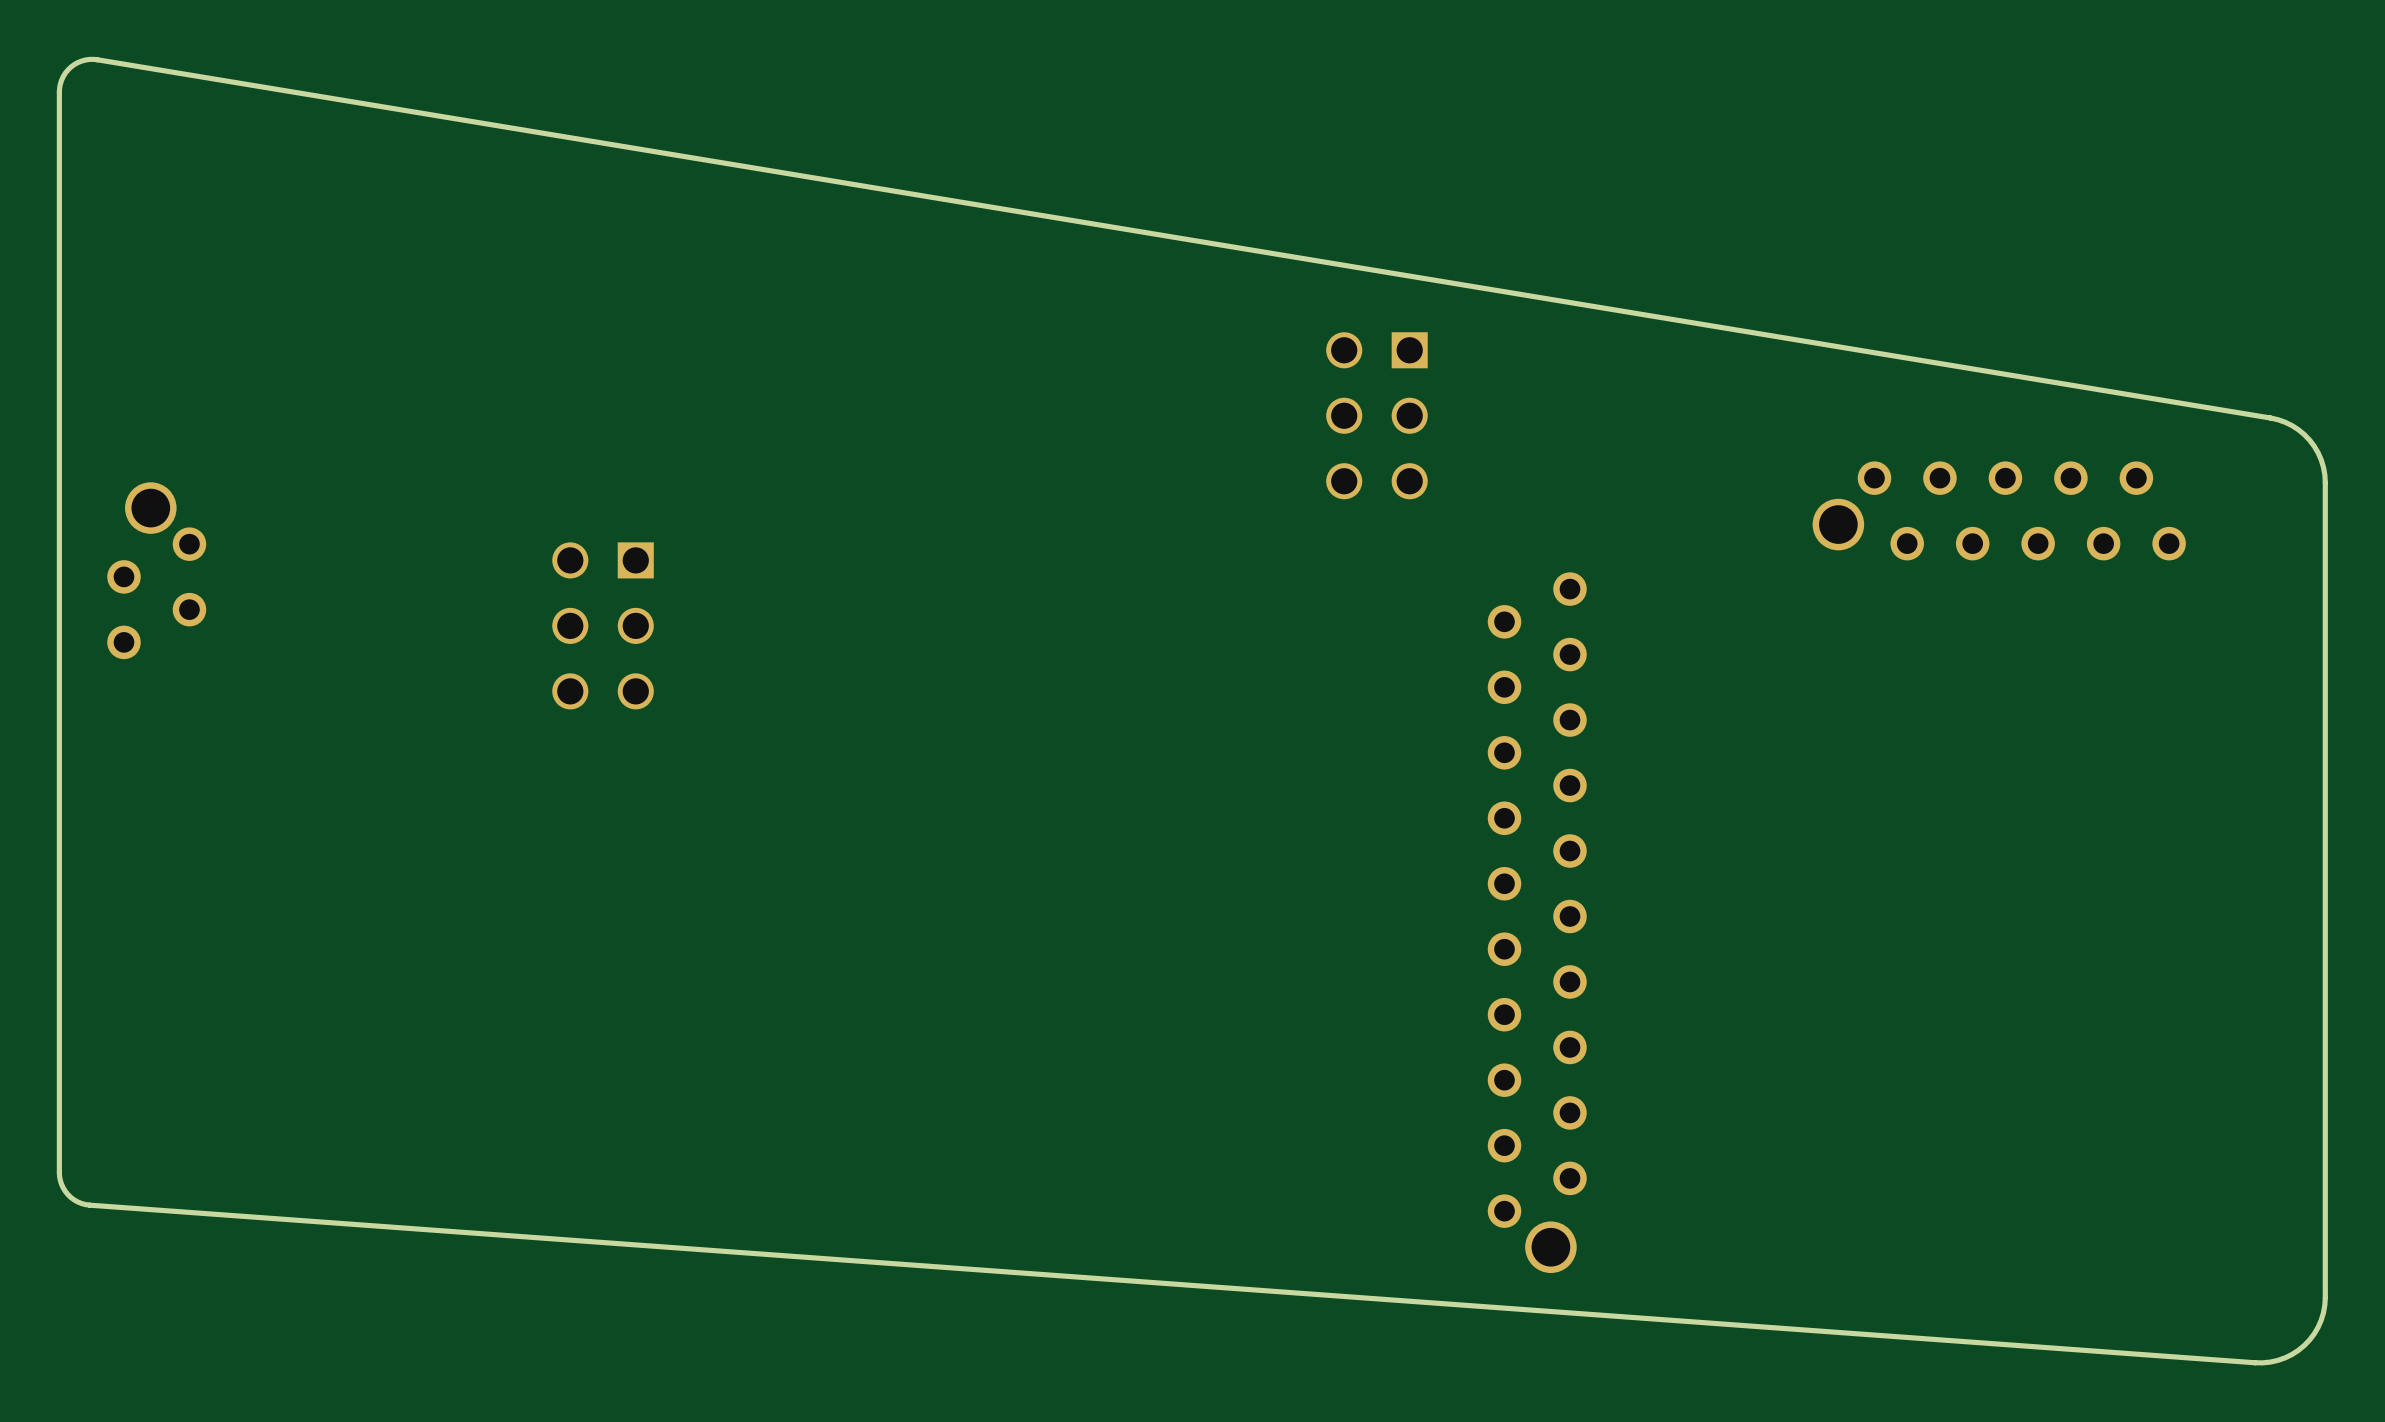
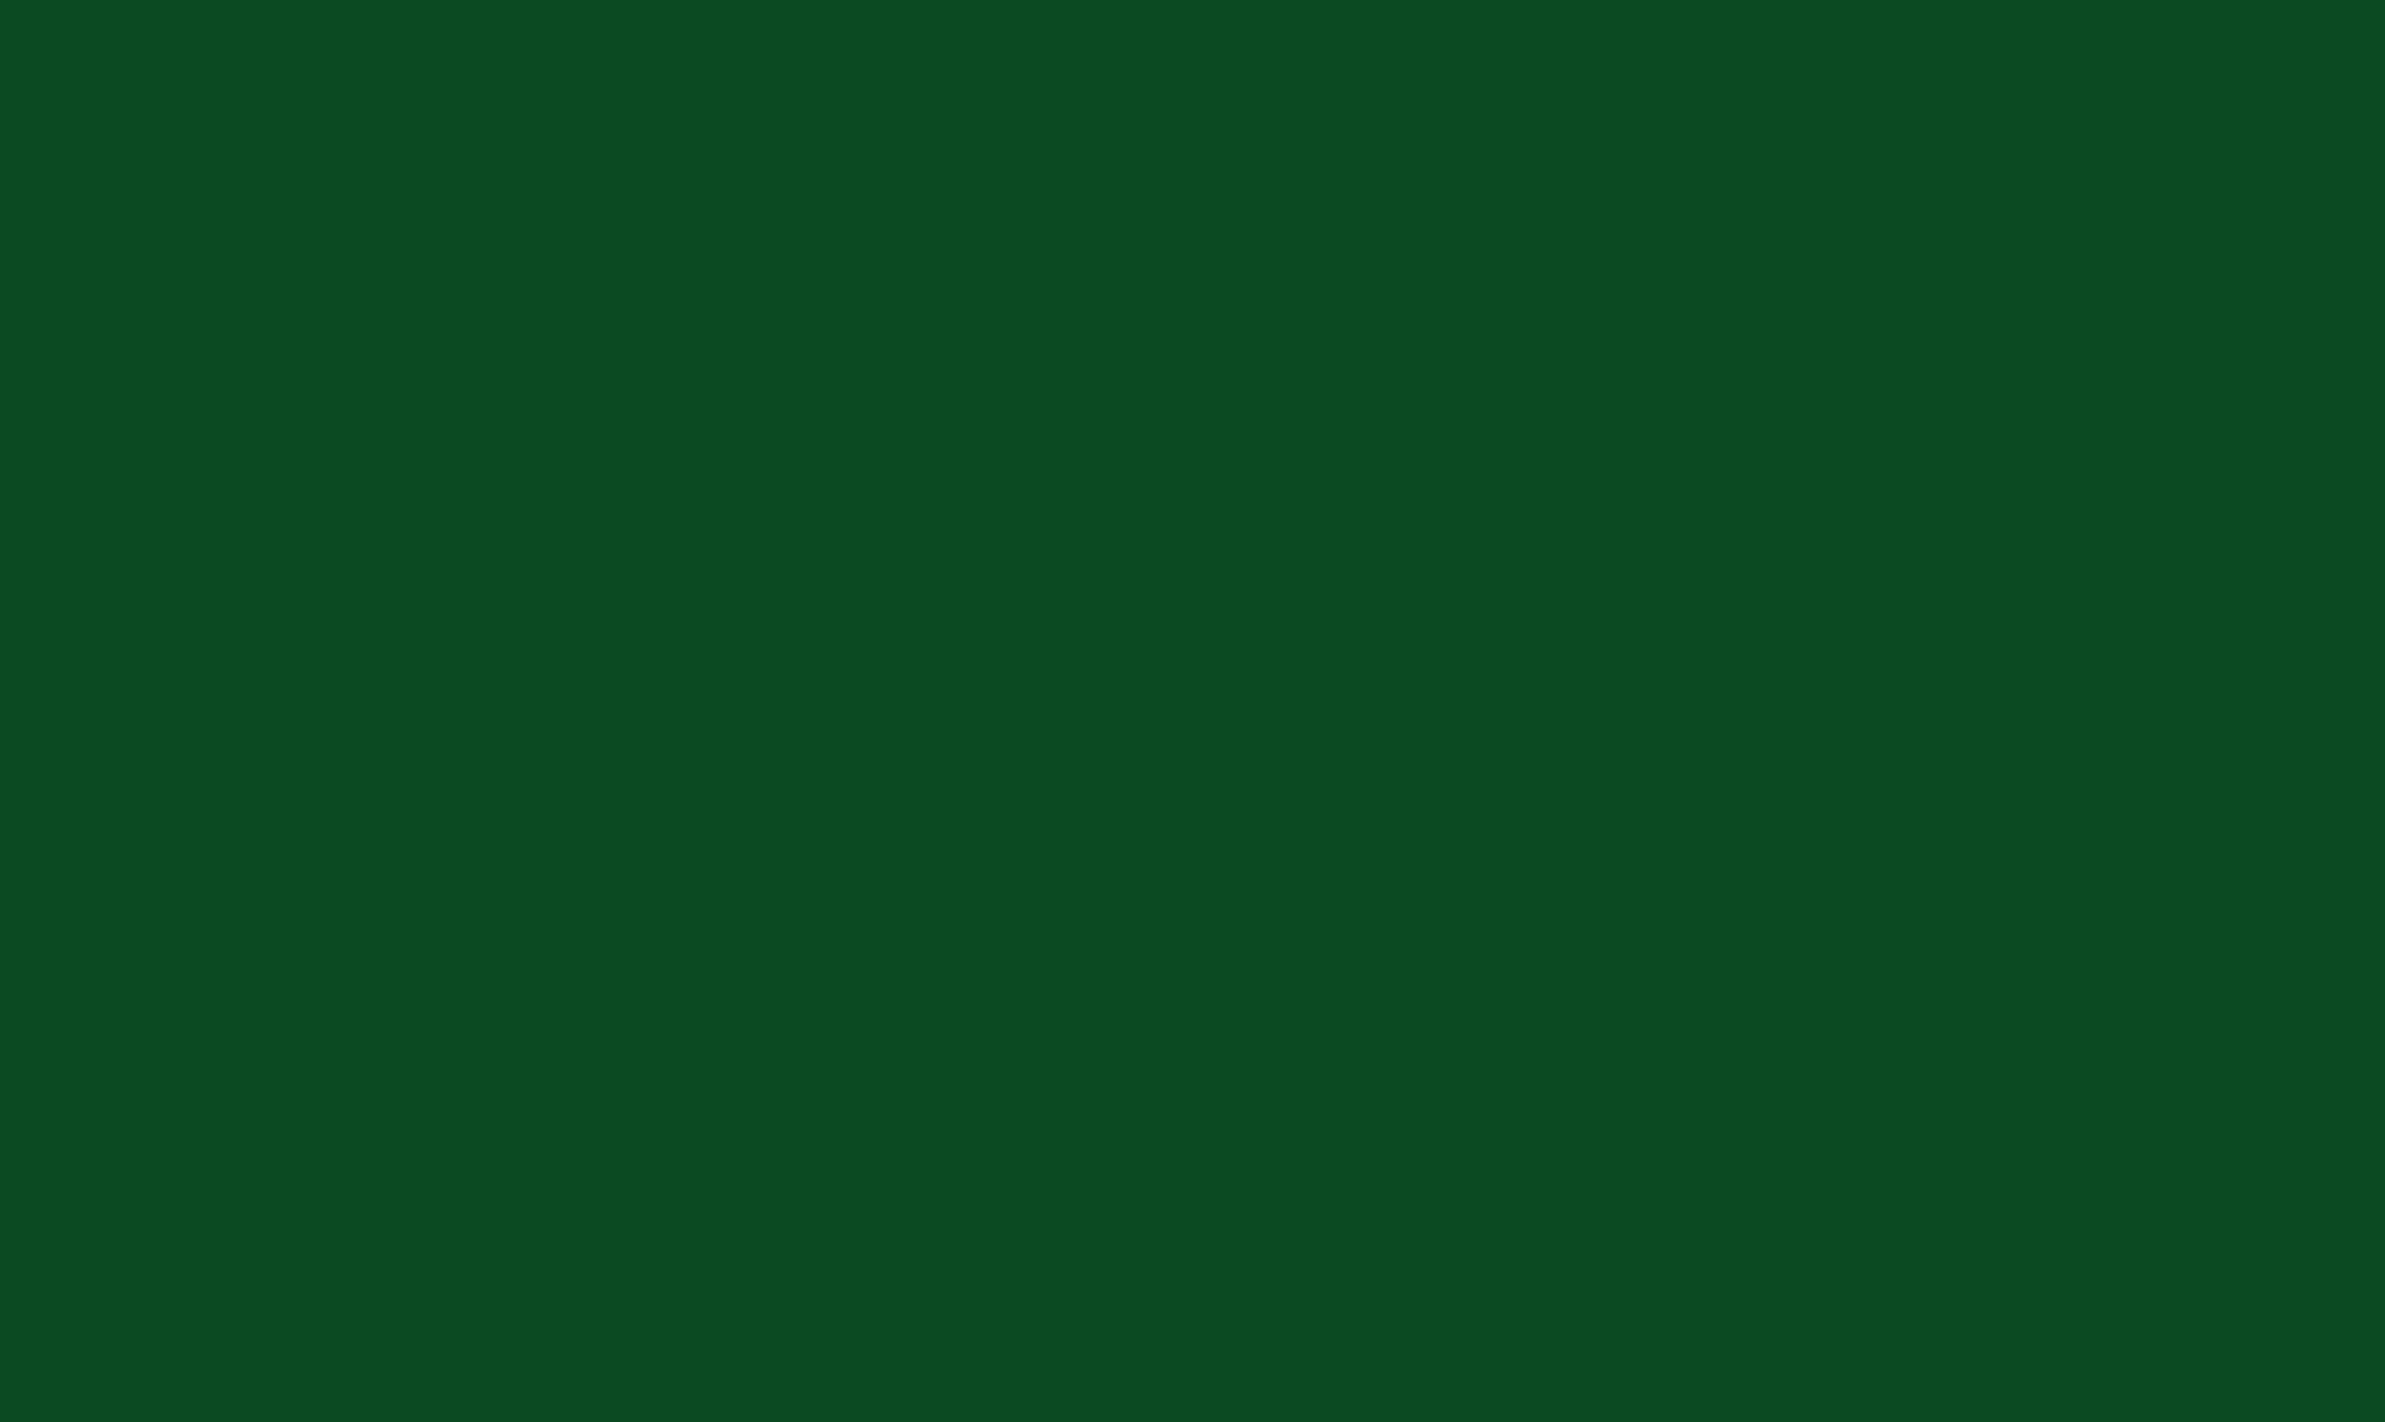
board edge: (97, 59) (2270, 418) (2292, 425) (2309, 440) (2318, 453) (2323, 467) (2325, 482) (2325, 1297) (2323, 1312) (2318, 1327) (2309, 1339) (2292, 1354) (2277, 1360) (2255, 1362) (89, 1205) (74, 1200) (63, 1188) (59, 1172) (59, 92) (61, 80) (70, 67) (85, 60) (97, 59) -> none
part: (1376, 415) -> none
part: (1999, 510) -> none
part: (156, 570) -> none
part: (603, 625) -> none
part: (1537, 922) -> none

